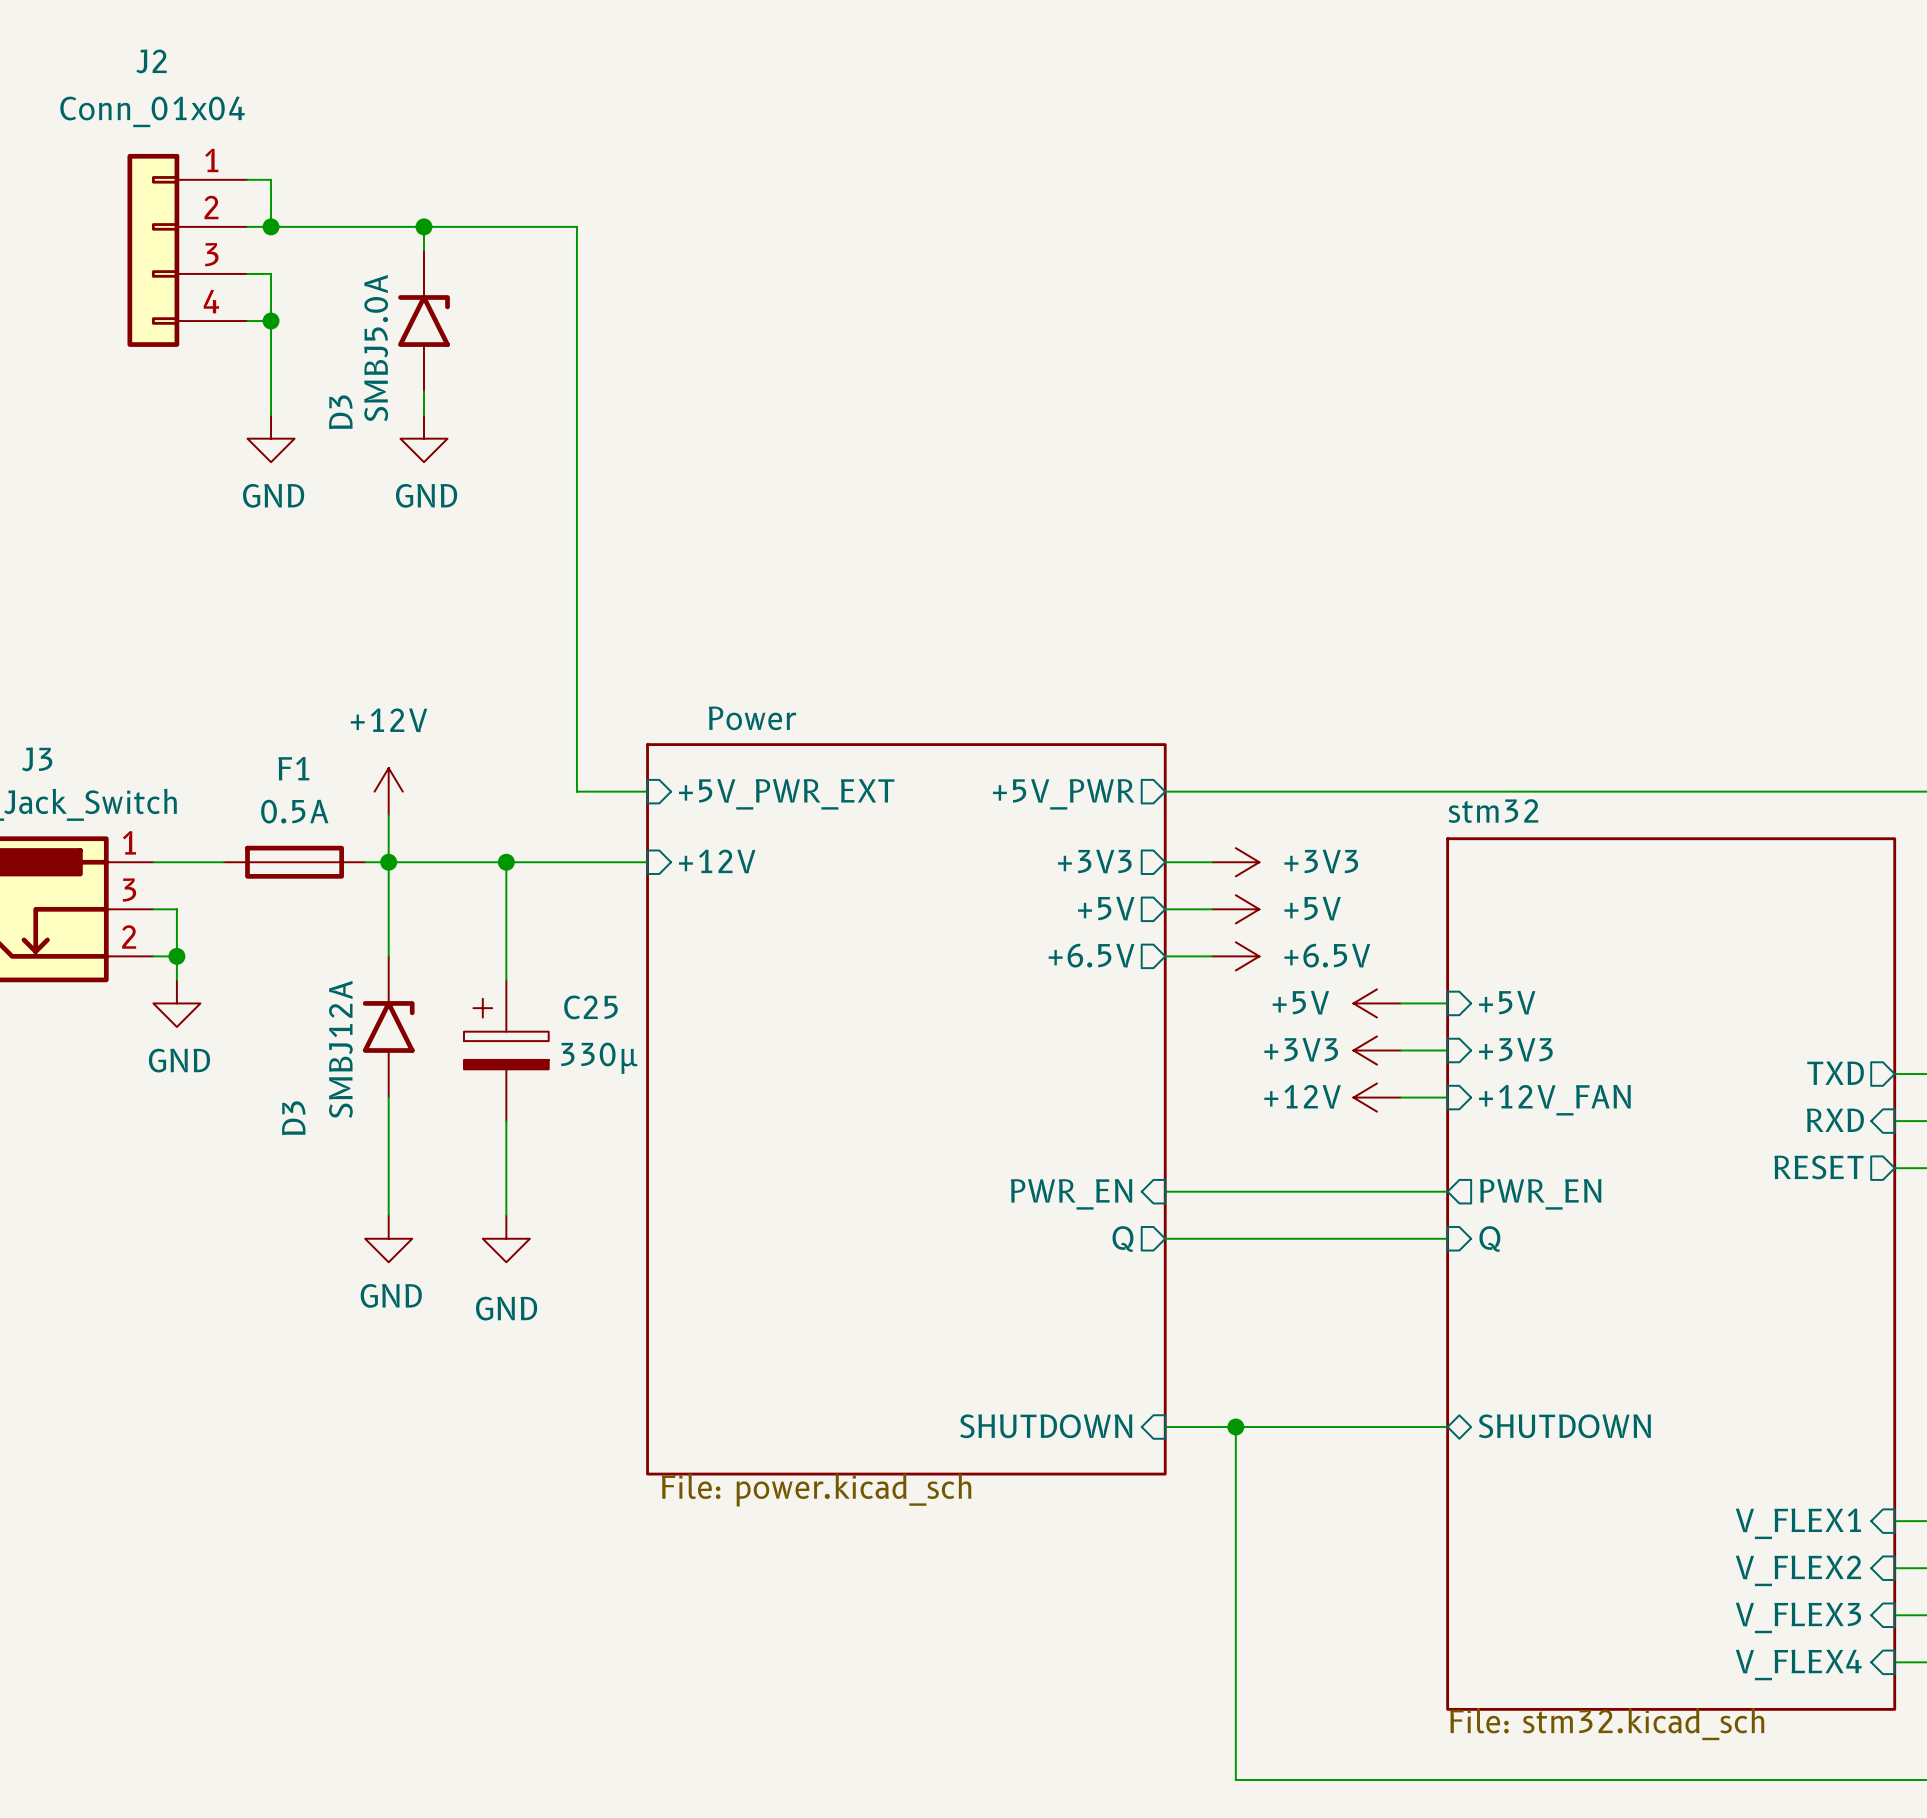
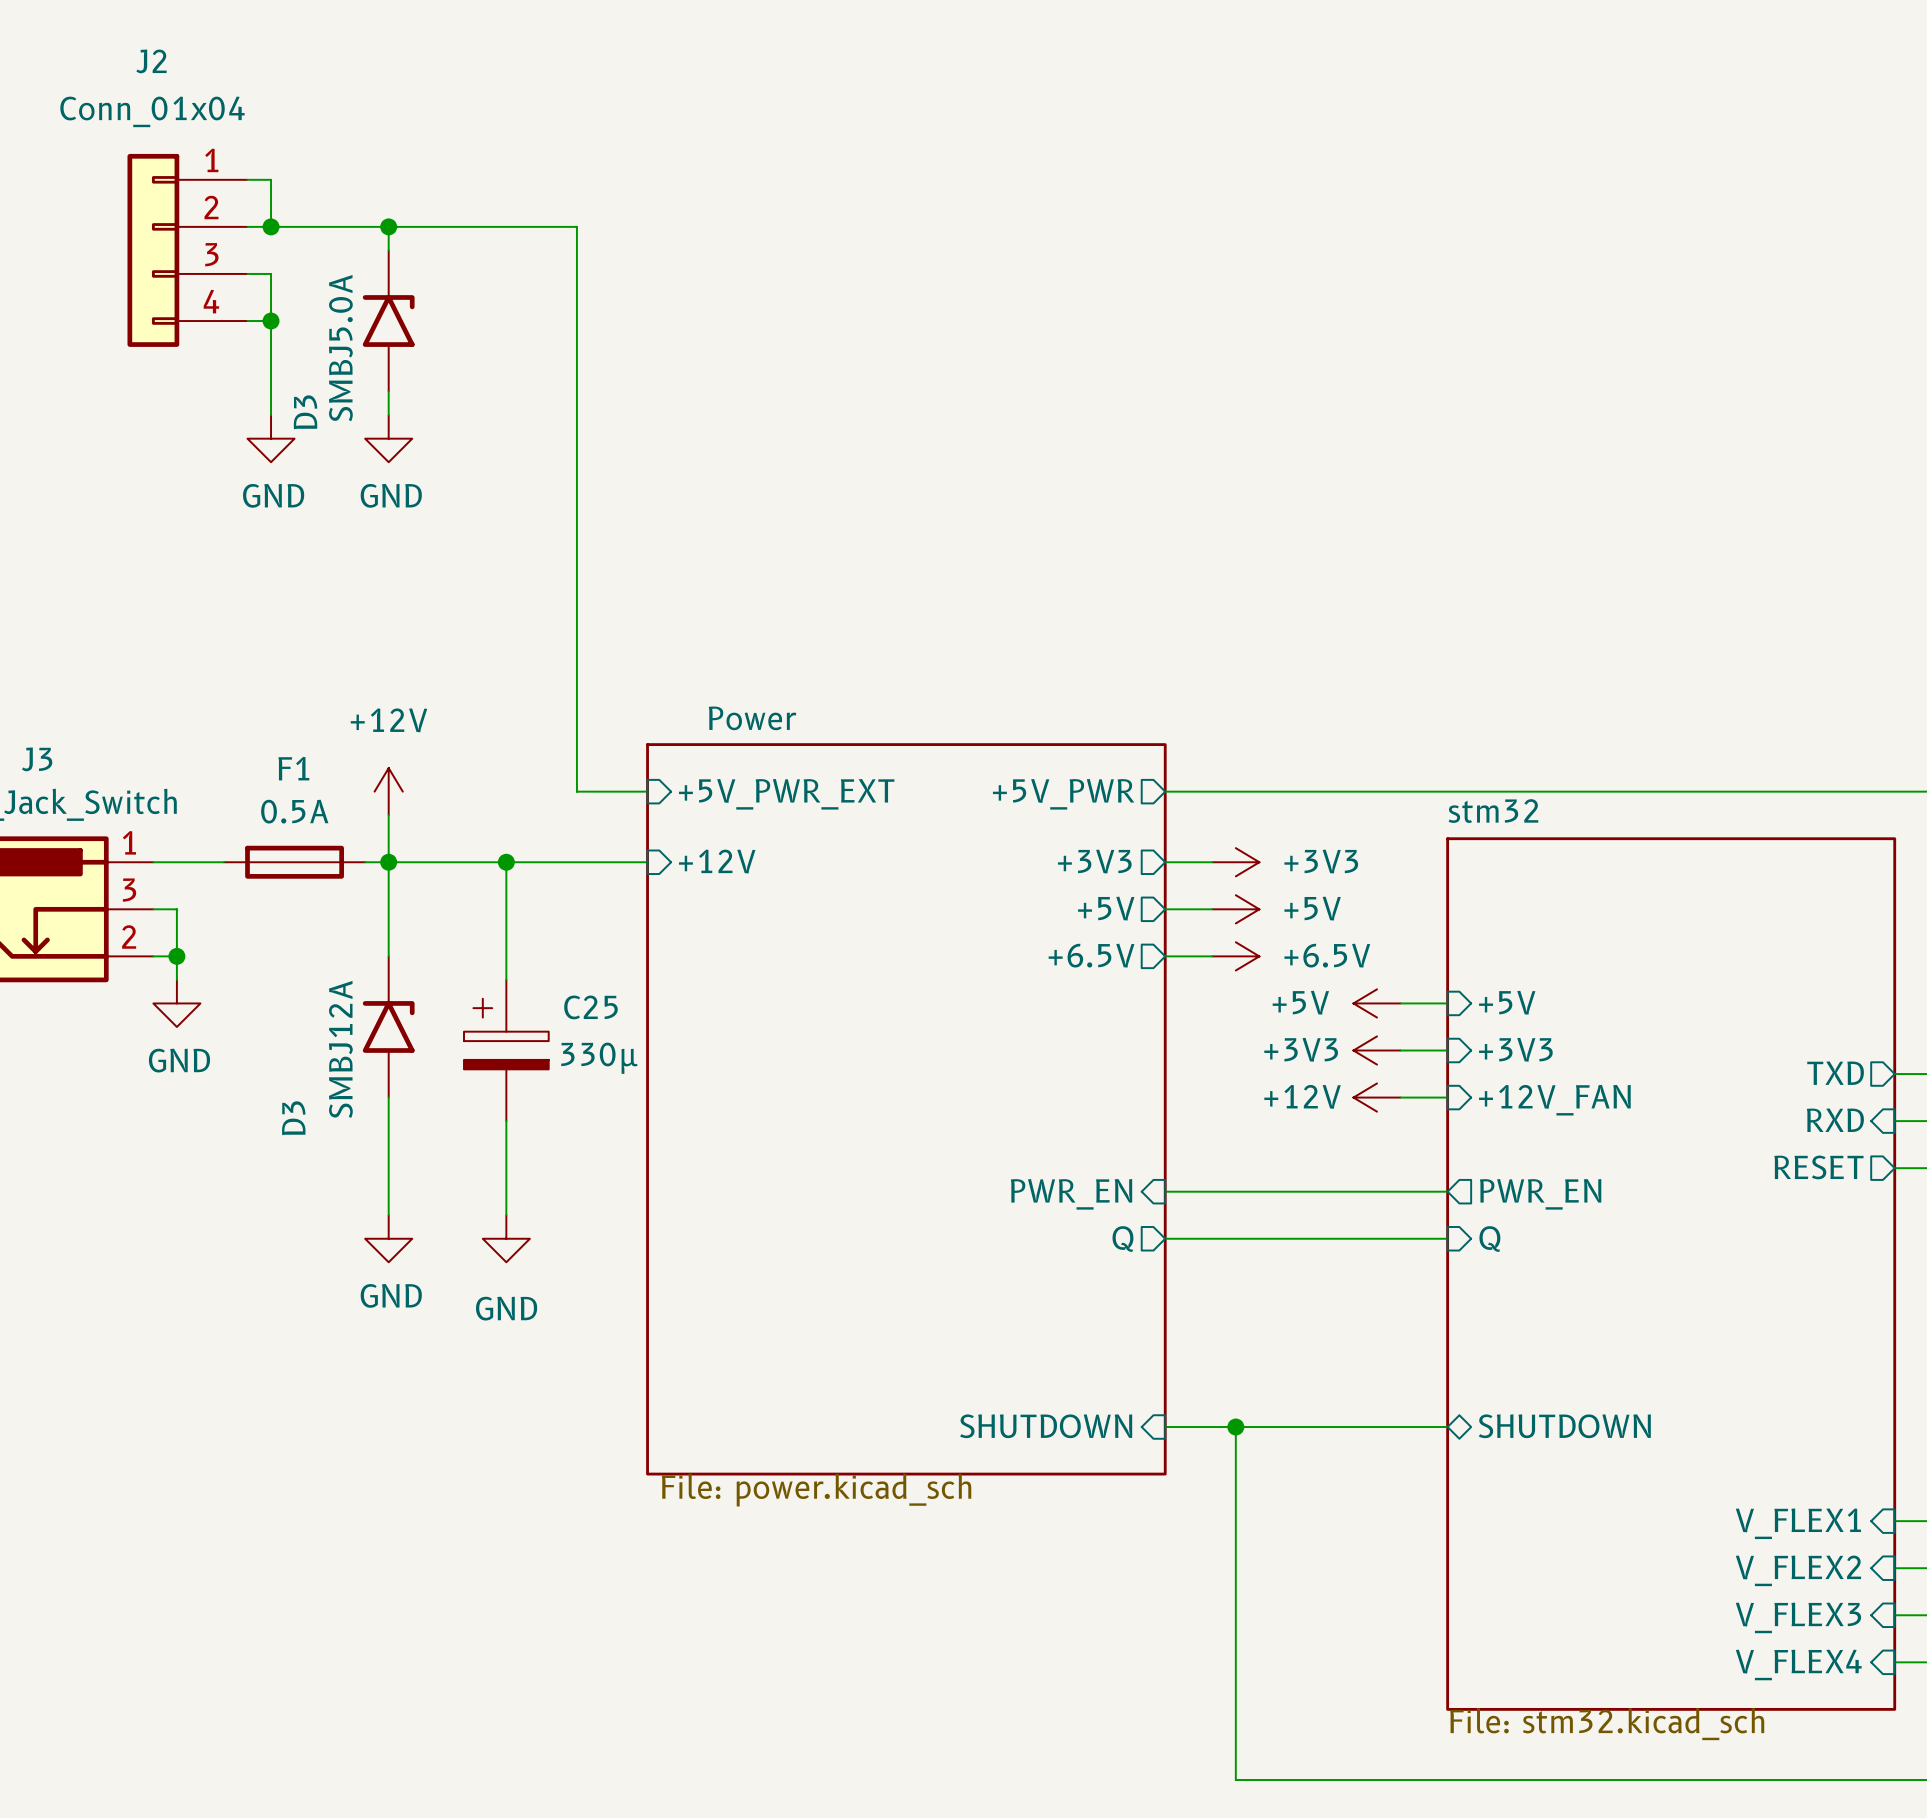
wire: (423, 226) (423, 250) -> (388, 226) (388, 250)
junction position: (423, 226) -> (388, 226)
D3 position: (423, 321) -> (388, 321)
wire: (423, 391) (423, 415) -> (388, 391) (388, 415)
power symbol position: GND (423, 438) -> GND (388, 438)

